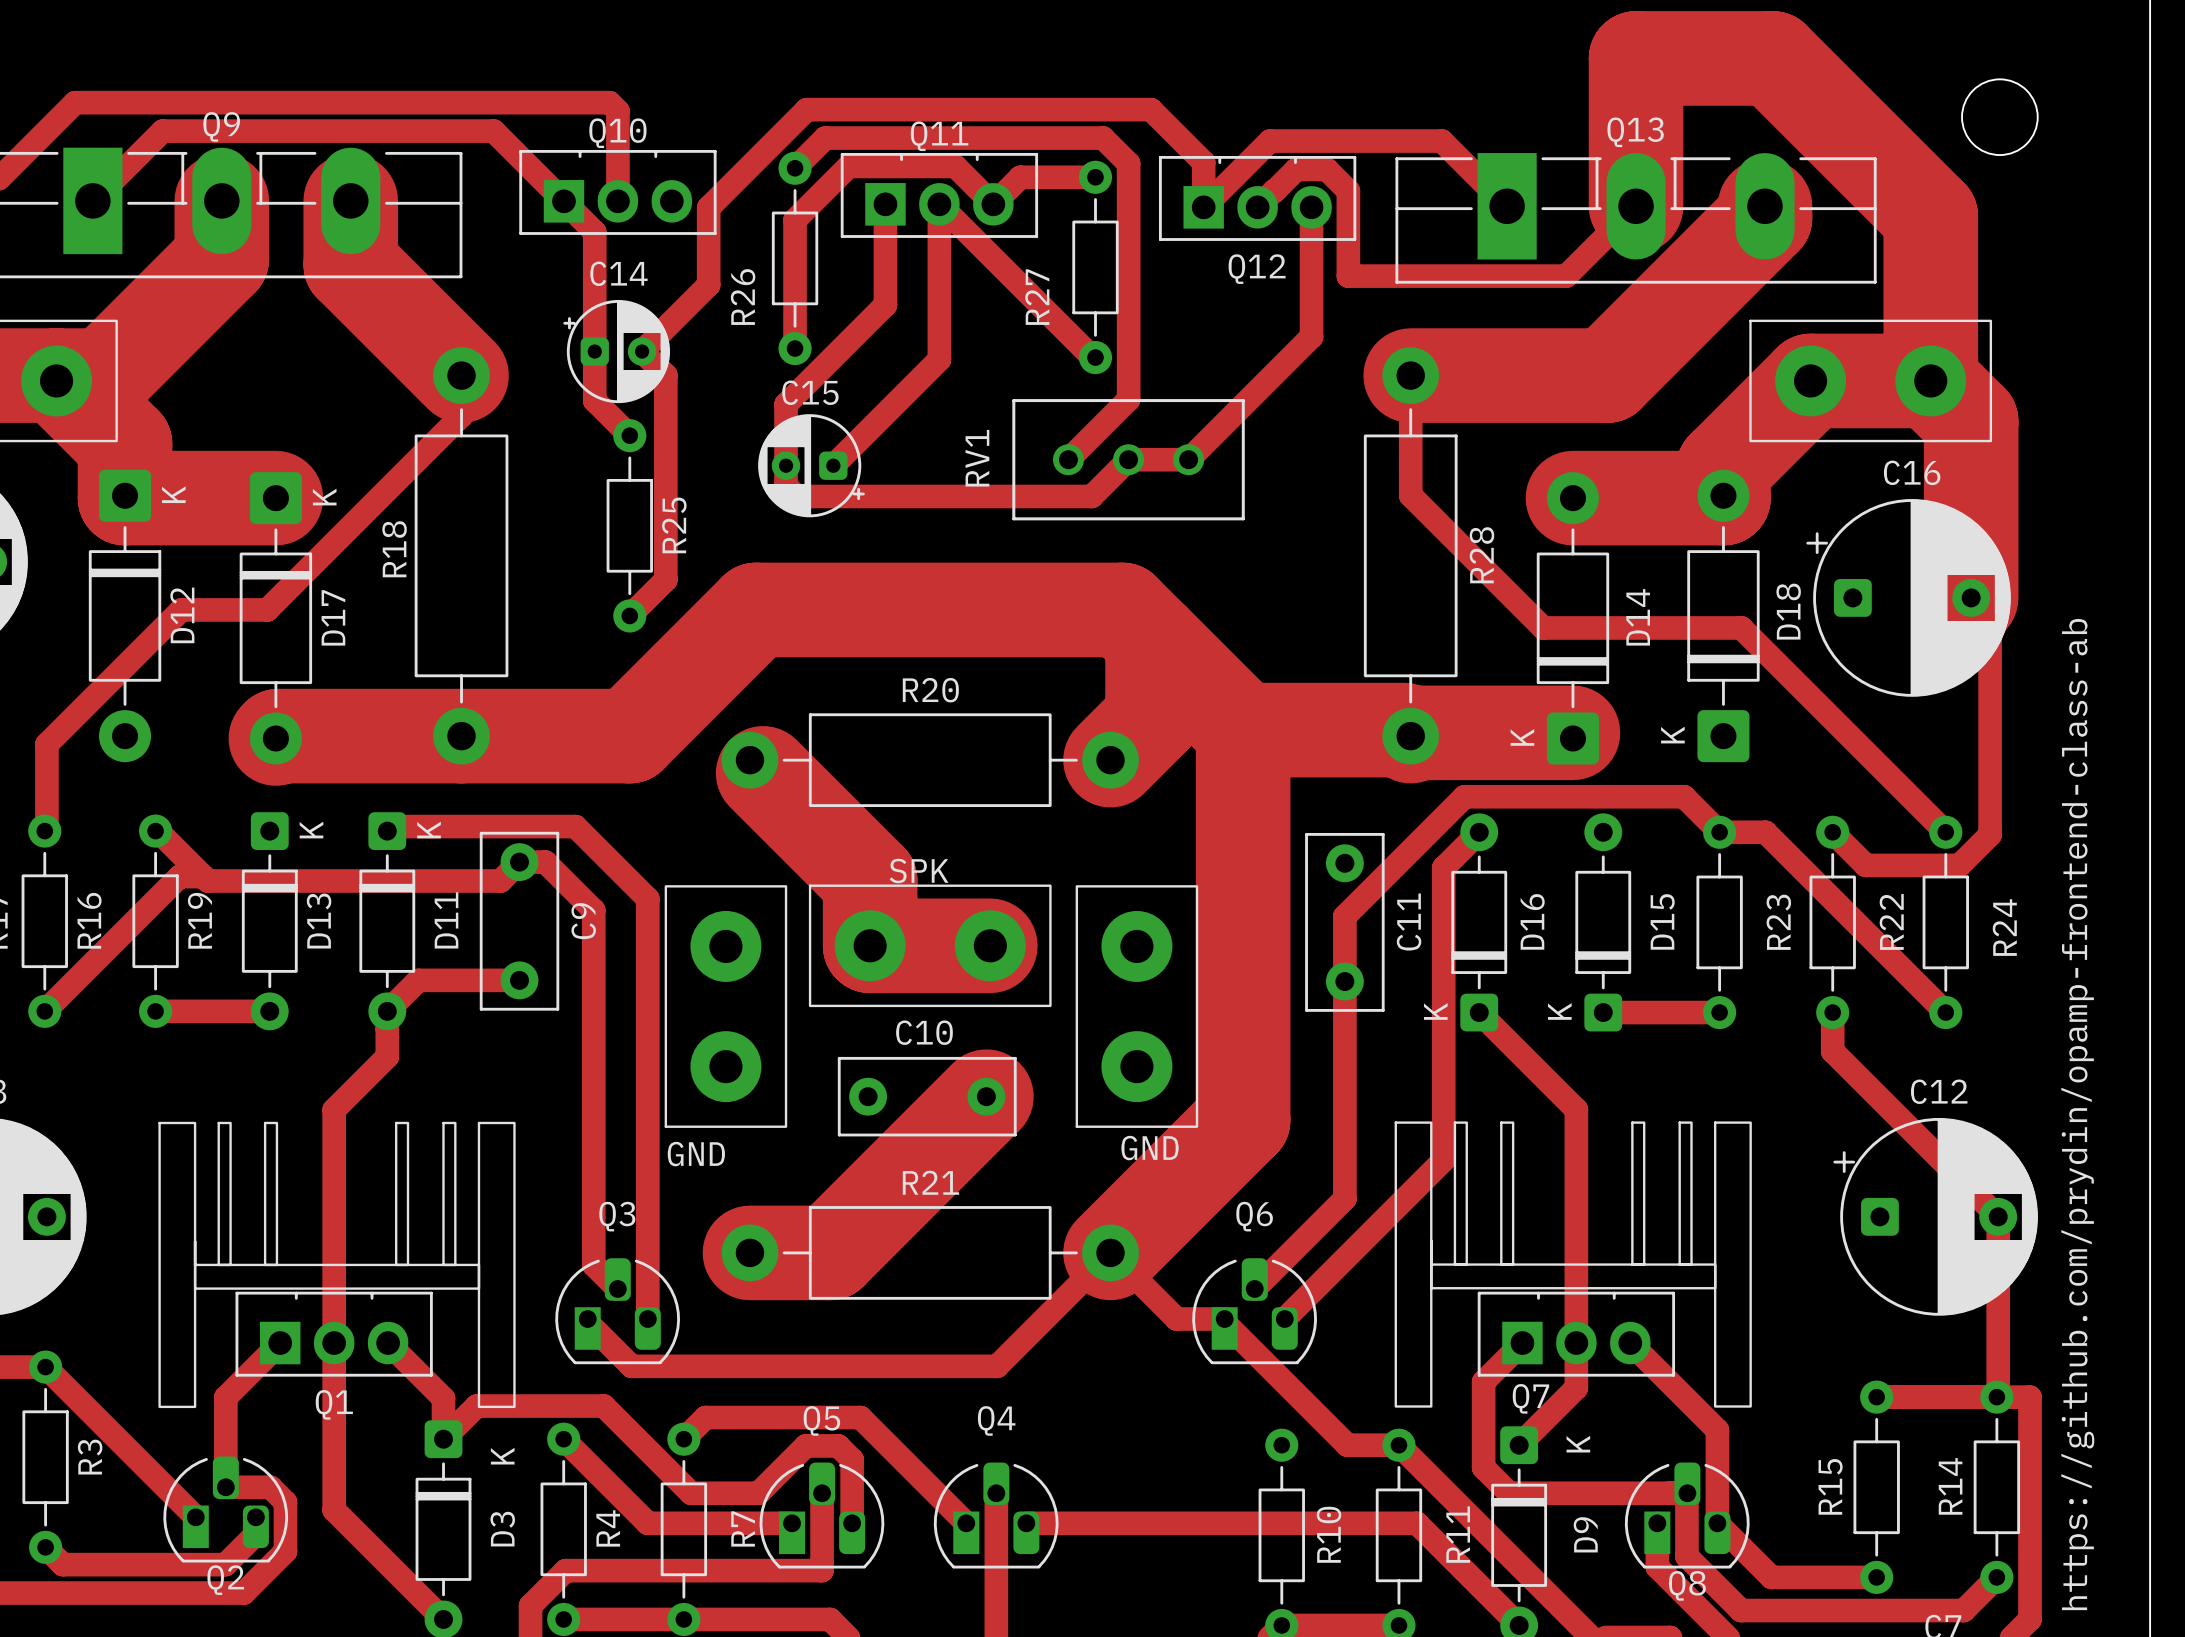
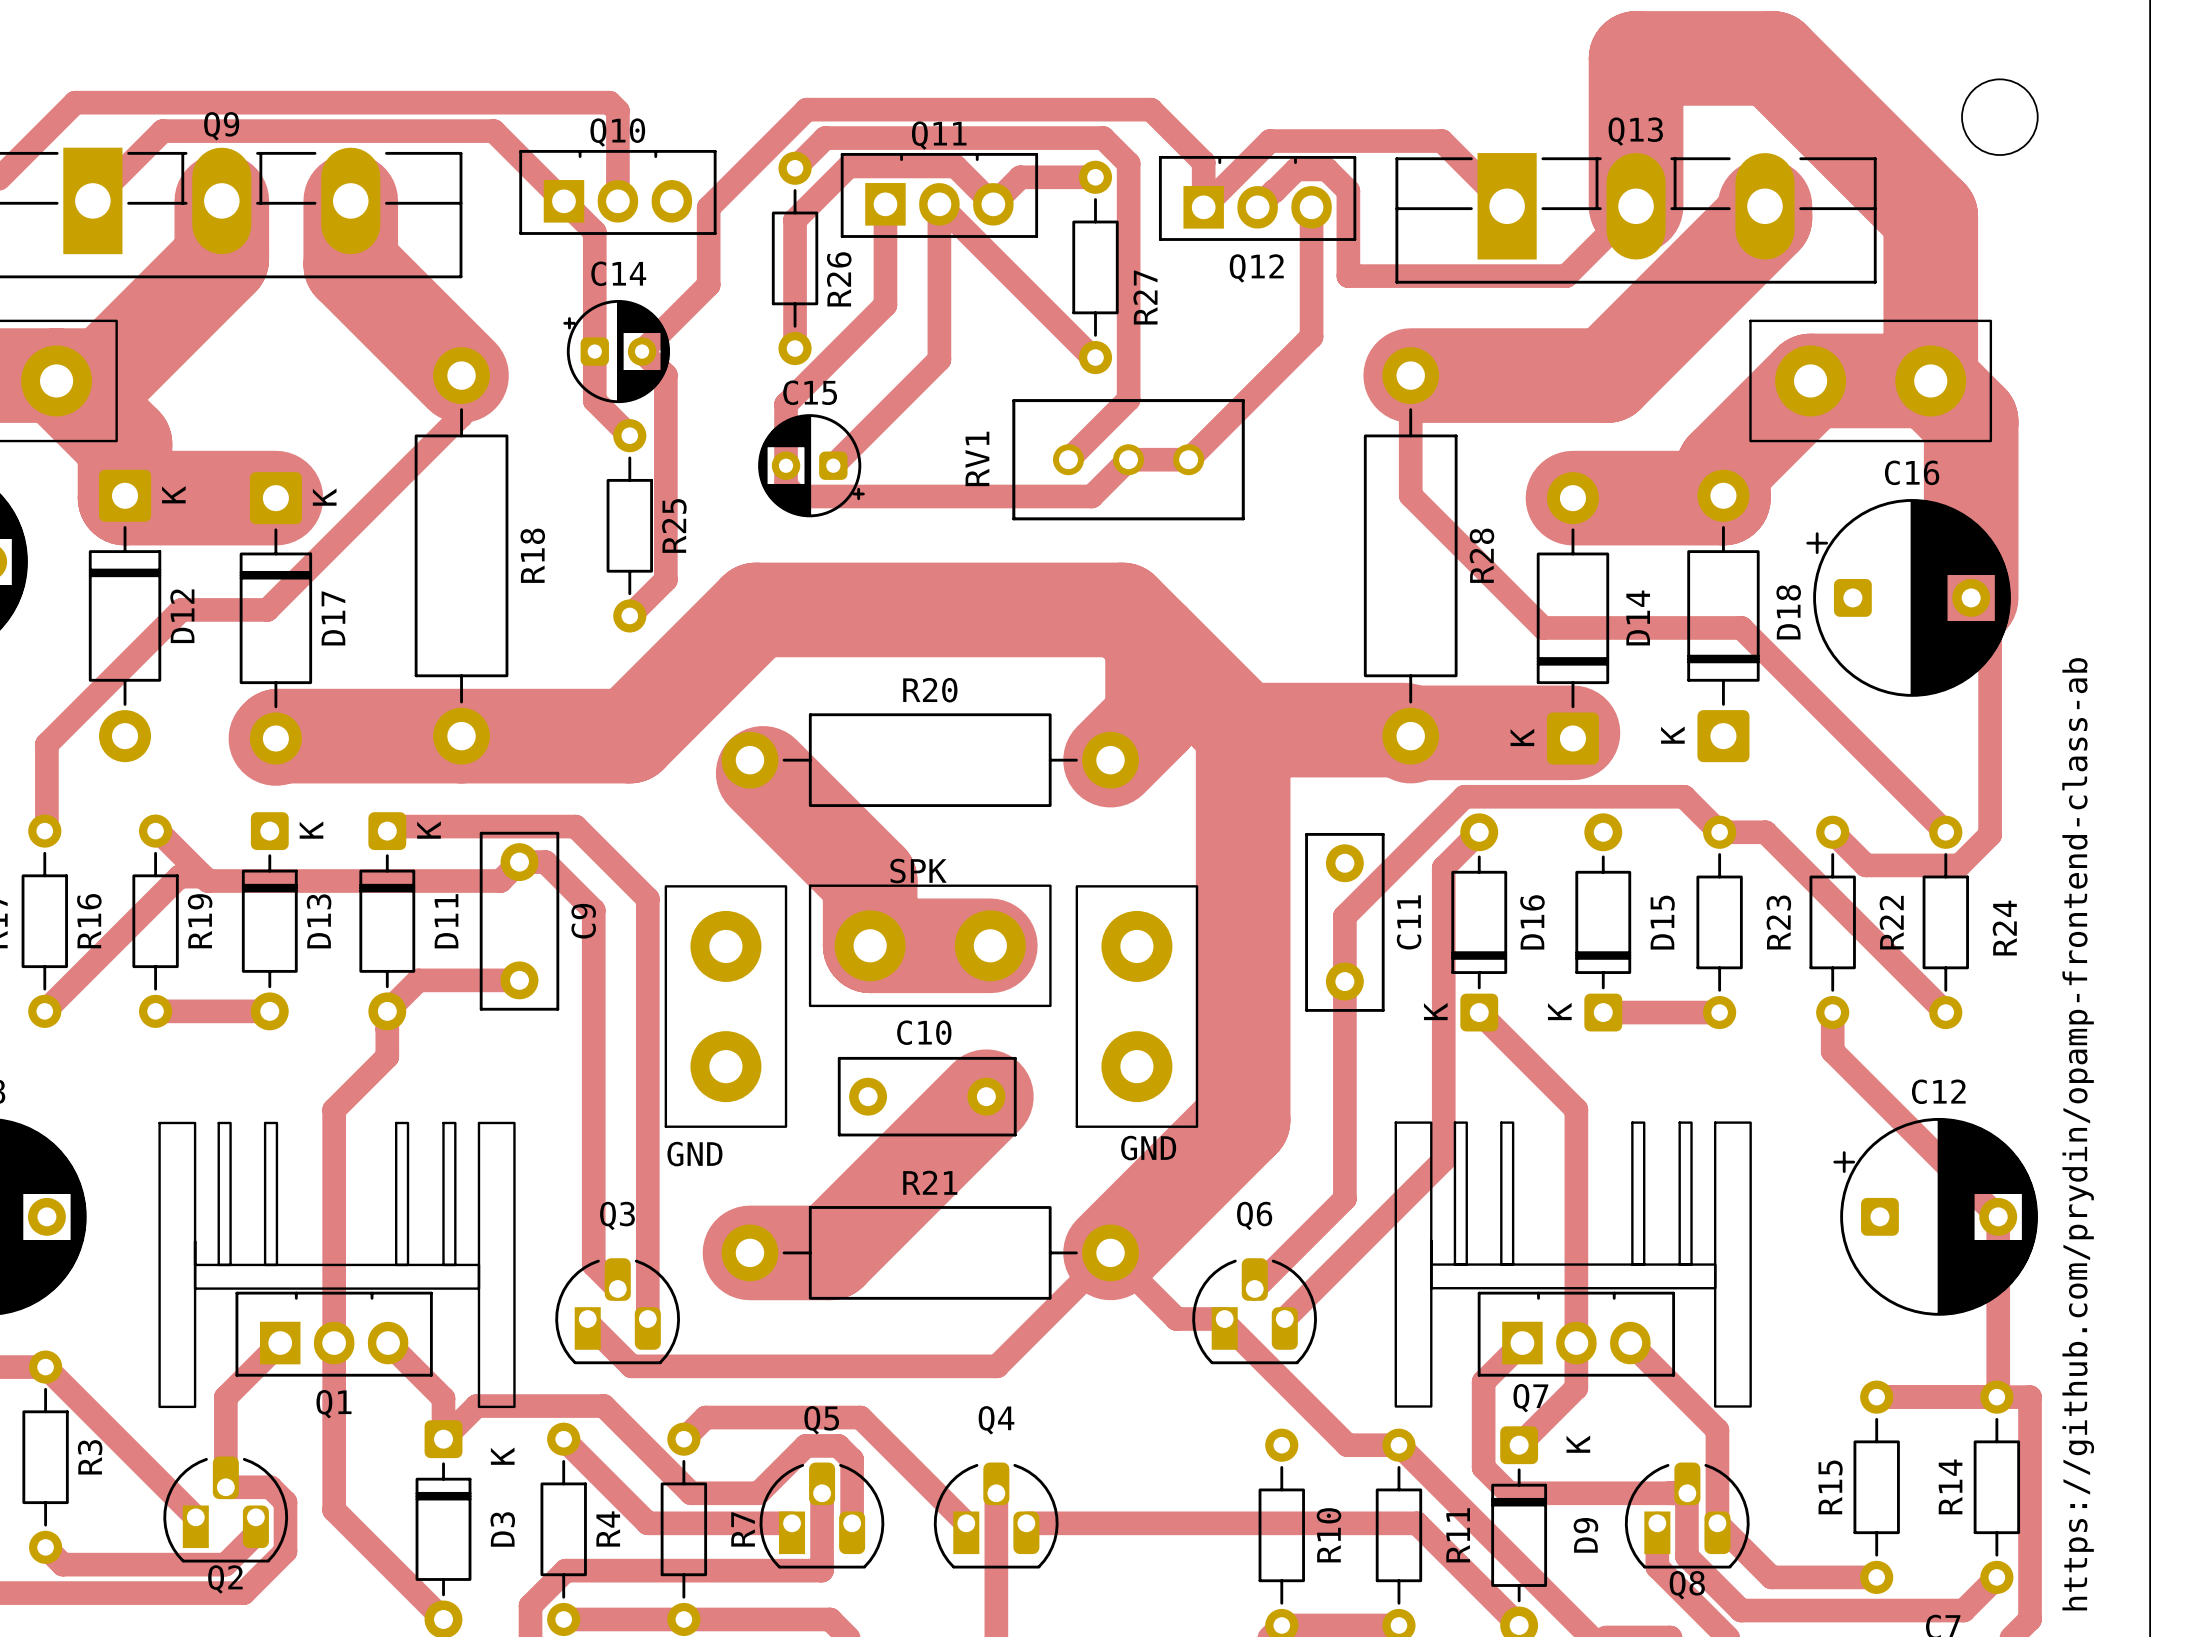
R26 name position: R26 (743, 297) -> R26 (839, 279)
R27 name position: R27 (1037, 297) -> R27 (1145, 297)
R18 name position: R18 (394, 549) -> R18 (532, 555)

